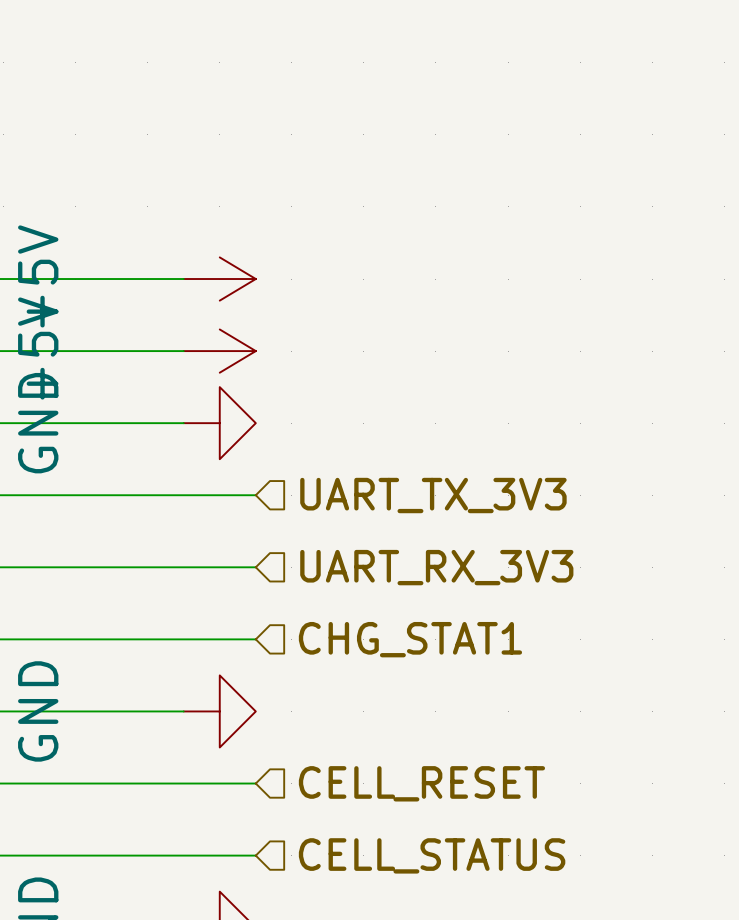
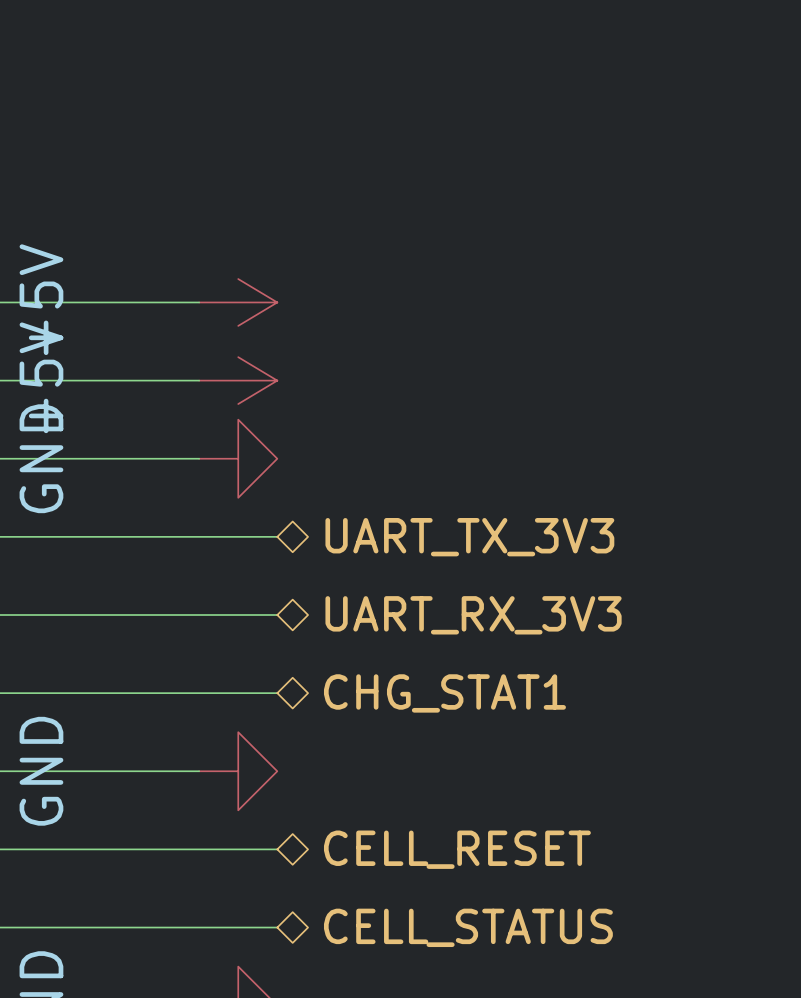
hierarchical label shape: input (433, 495) -> bidirectional (469, 537)
hierarchical label shape: input (436, 567) -> bidirectional (473, 615)
hierarchical label shape: input (410, 639) -> bidirectional (444, 693)
hierarchical label shape: input (421, 783) -> bidirectional (457, 849)
hierarchical label shape: input (432, 855) -> bidirectional (468, 927)

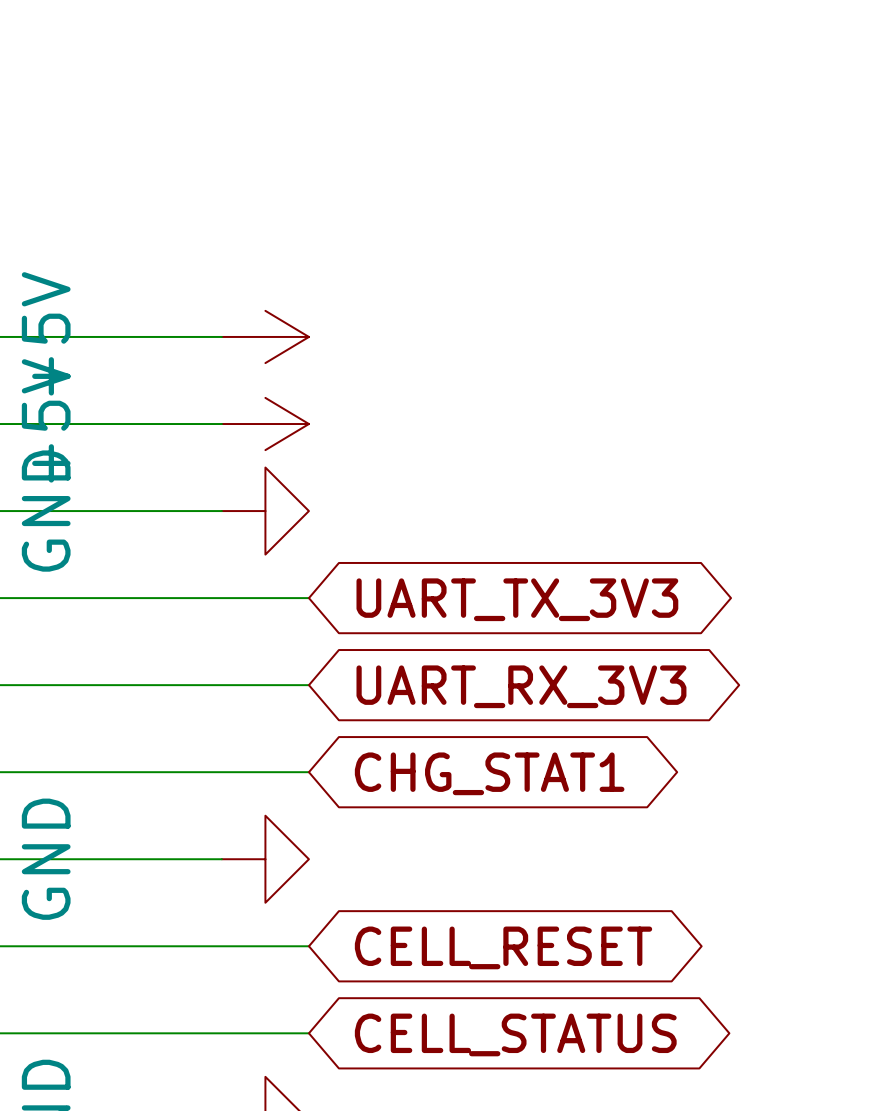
hierarchical label: UART_TX_3V3 (469, 537) -> none
global label: none -> UART_TX_3V3 (517, 599)
hierarchical label: UART_RX_3V3 (473, 615) -> none
global label: none -> UART_RX_3V3 (521, 686)
hierarchical label: CHG_STAT1 (444, 693) -> none
global label: none -> CHG_STAT1 (489, 773)
hierarchical label: CELL_RESET (457, 849) -> none
global label: none -> CELL_RESET (503, 947)
hierarchical label: CELL_STATUS (468, 927) -> none
global label: none -> CELL_STATUS (515, 1034)

